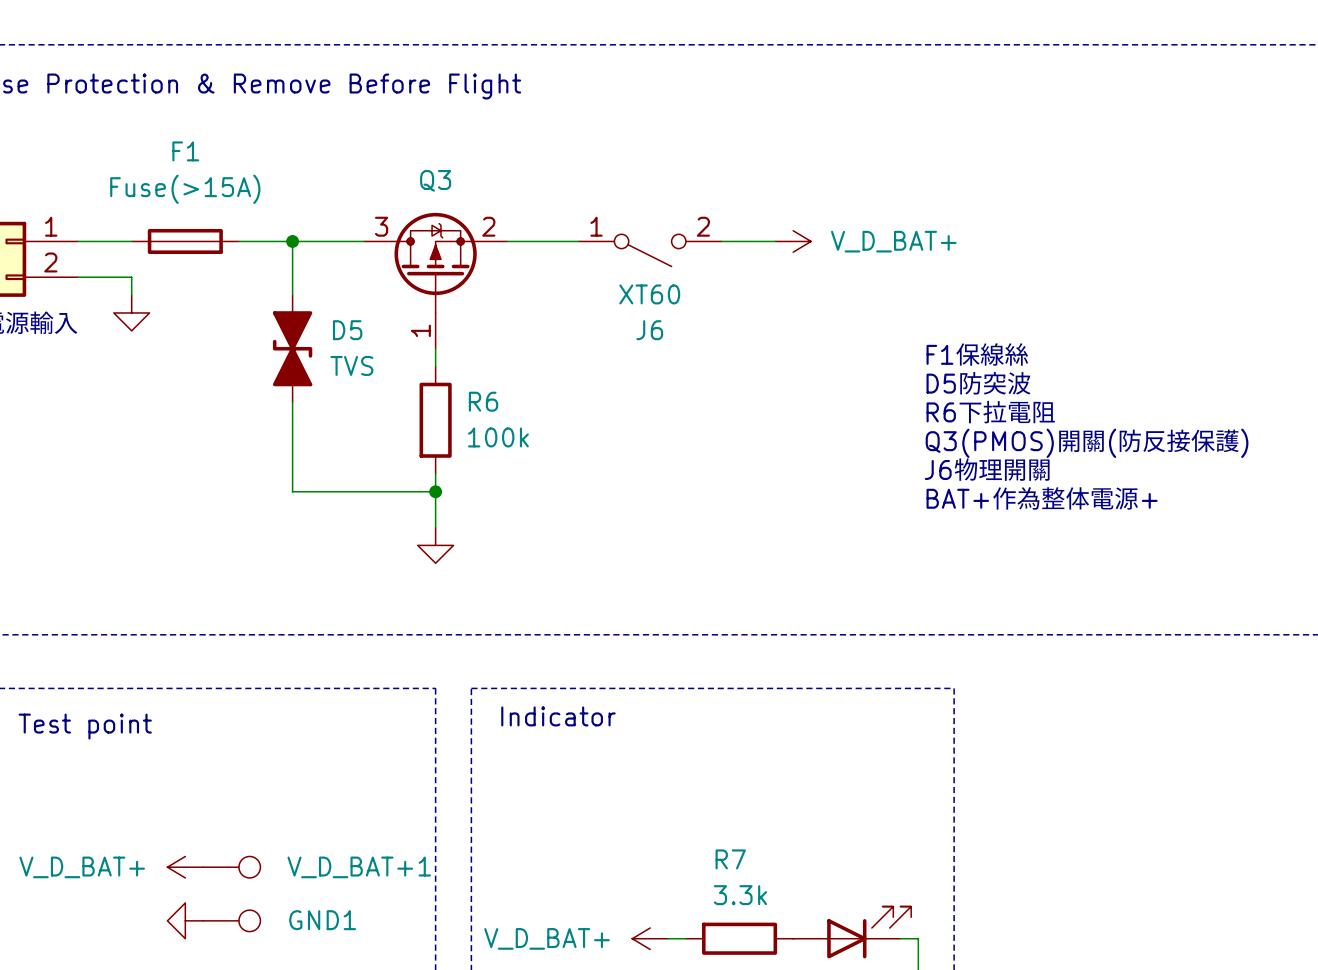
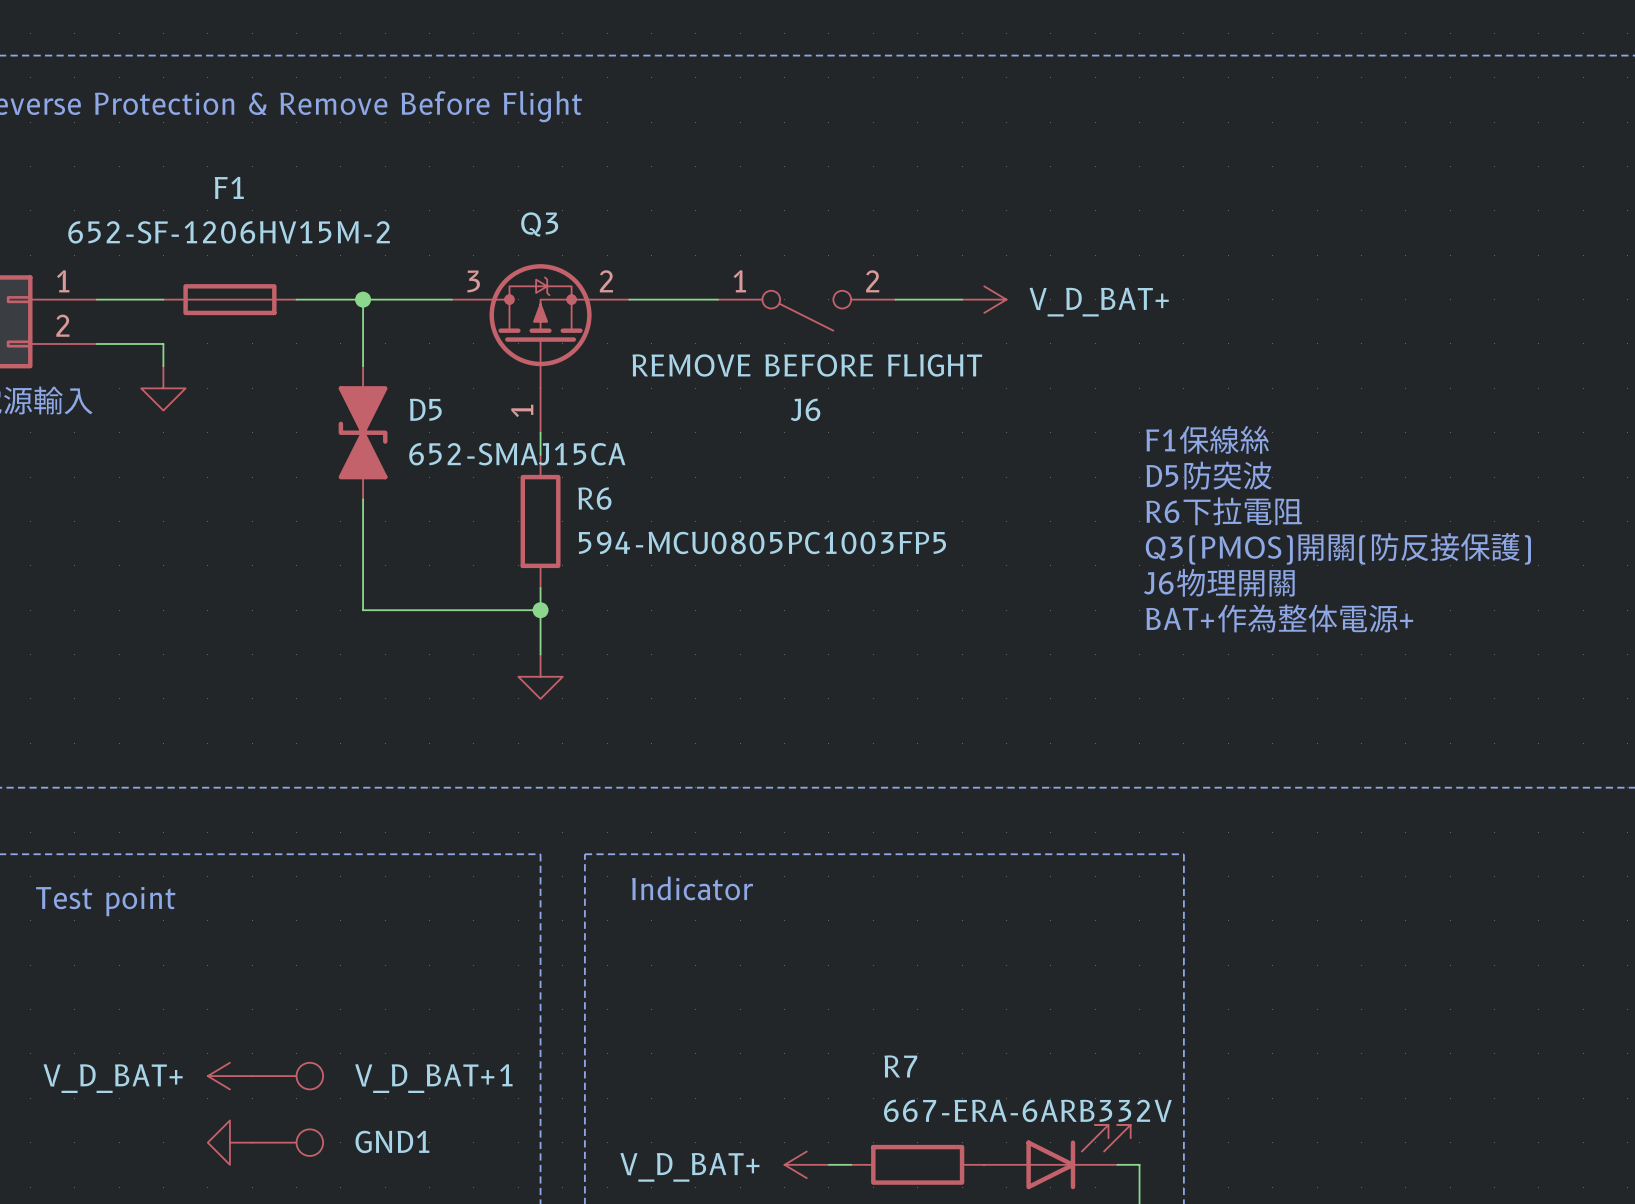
F1 value: Fuse(>15A) (185, 189) -> 652-SF-1206HV15M-2 (229, 232)
J6 value: XT60 (649, 294) -> REMOVE BEFORE FLIGHT (807, 365)
D5 value: TVS (351, 365) -> 652-SMAJ15CA (517, 454)
R6 value: 100k (498, 437) -> 594-MCU0805PC1003FP5 (762, 542)
R7 value: 3.3k (740, 895) -> 667-ERA-6ARB332V (1027, 1110)

